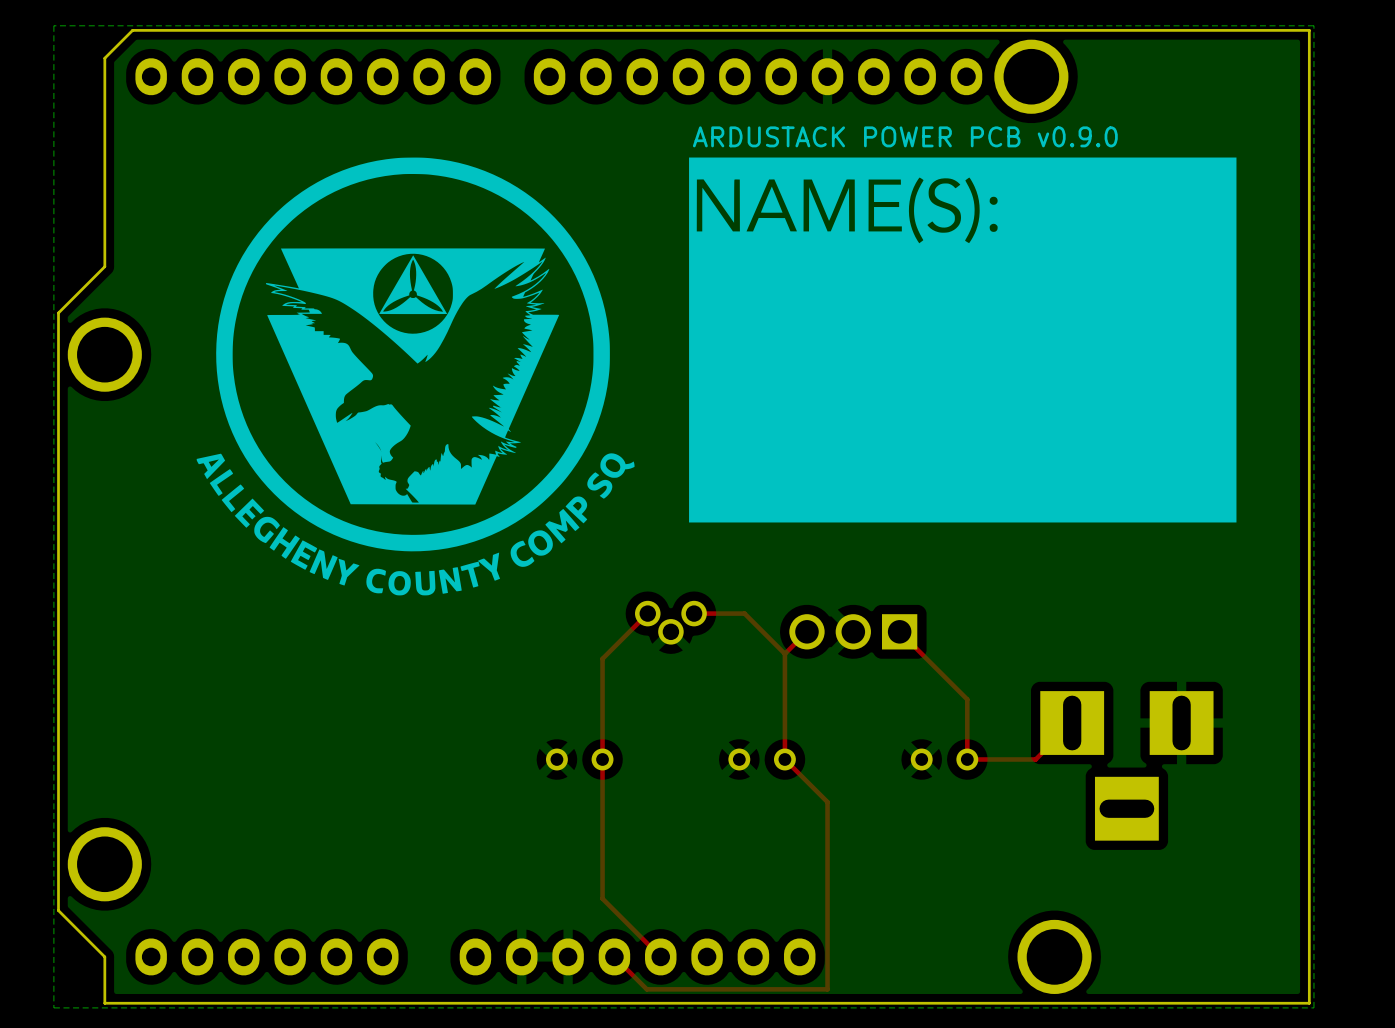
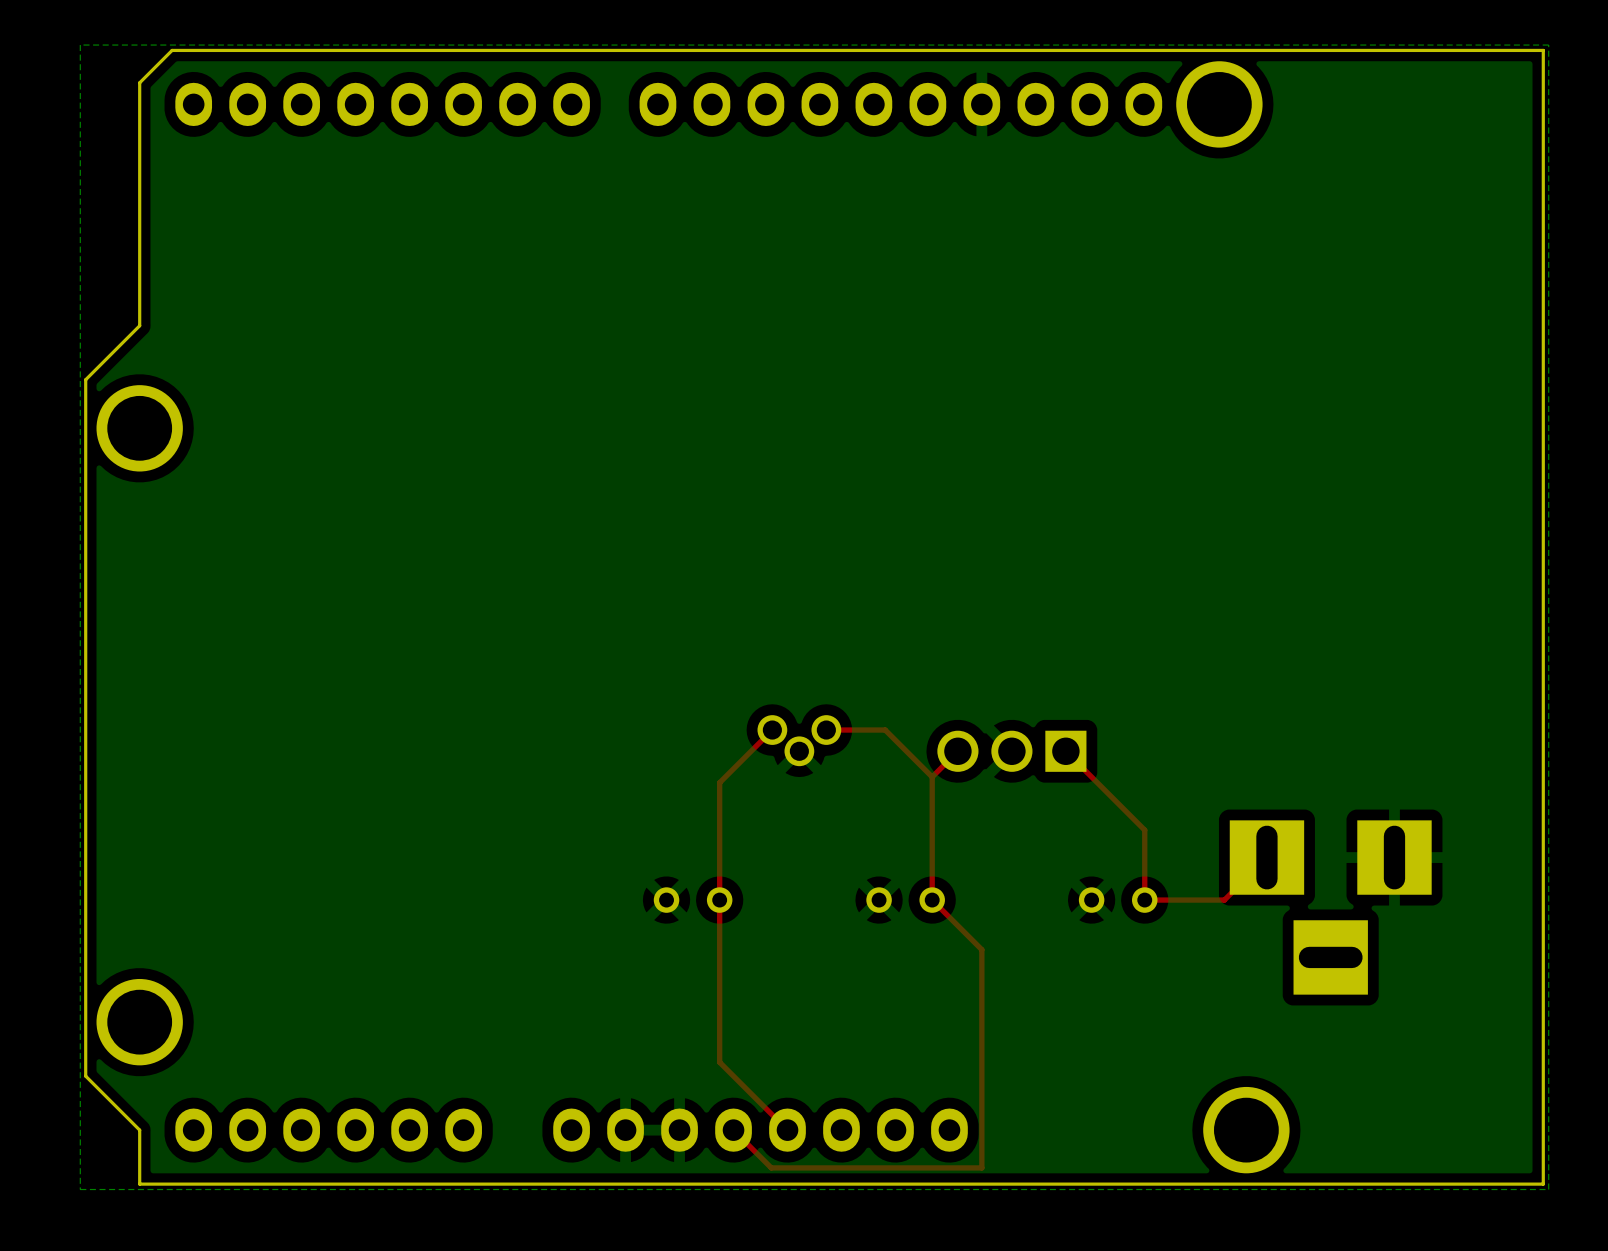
text: ARDUSTACK POWER PCB v0.9.0 (905, 136) -> none
drawing: [196, 157, 635, 596] -> none
drawing: [689, 157, 1237, 523] -> none

